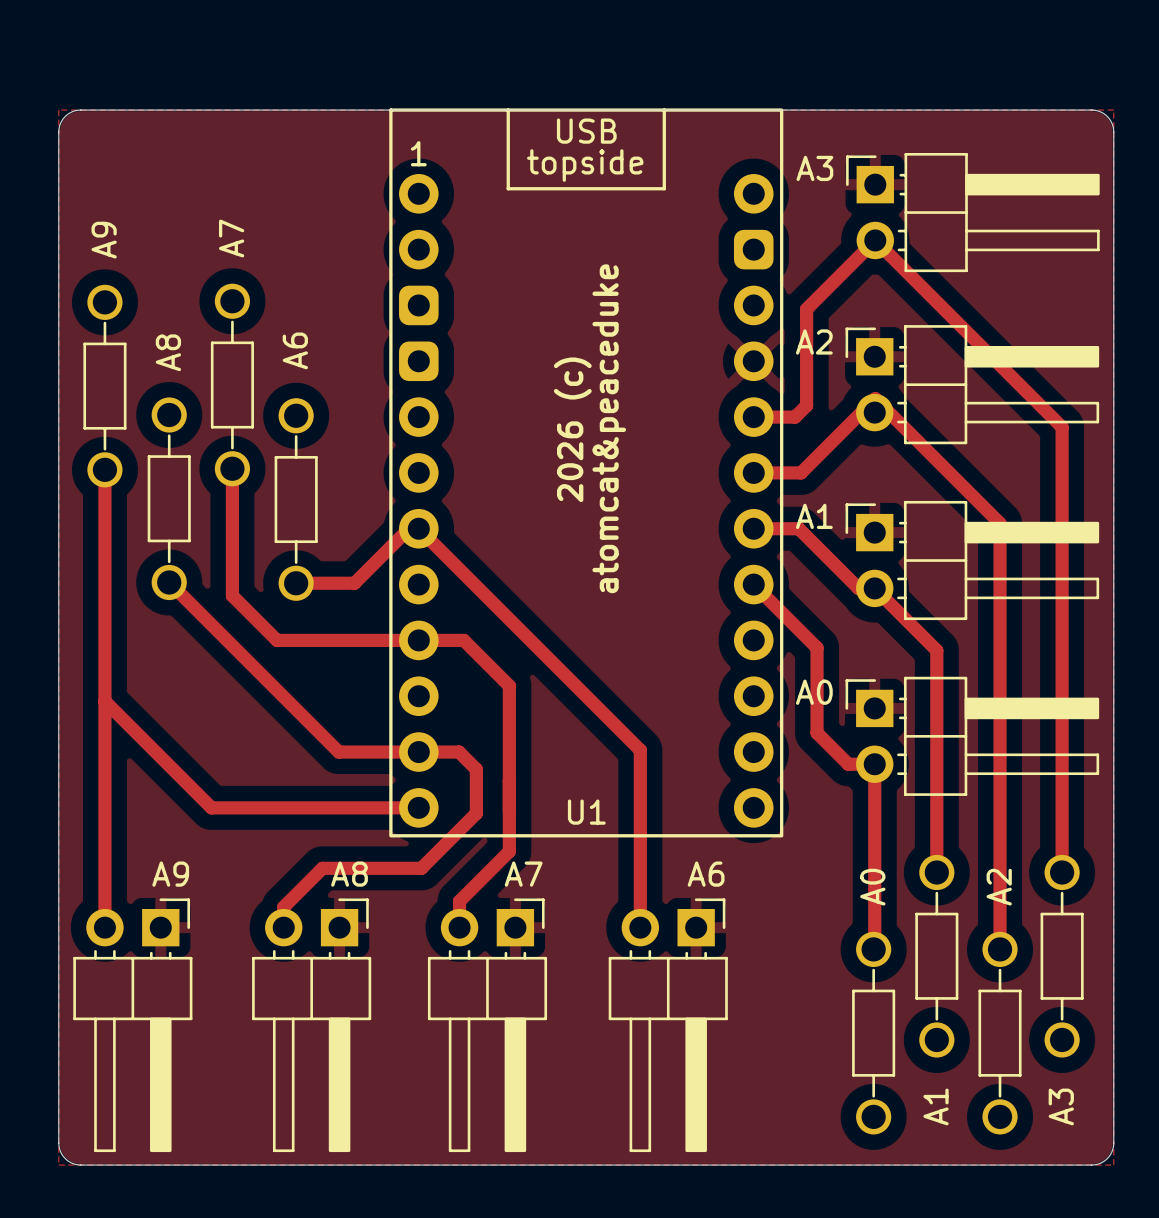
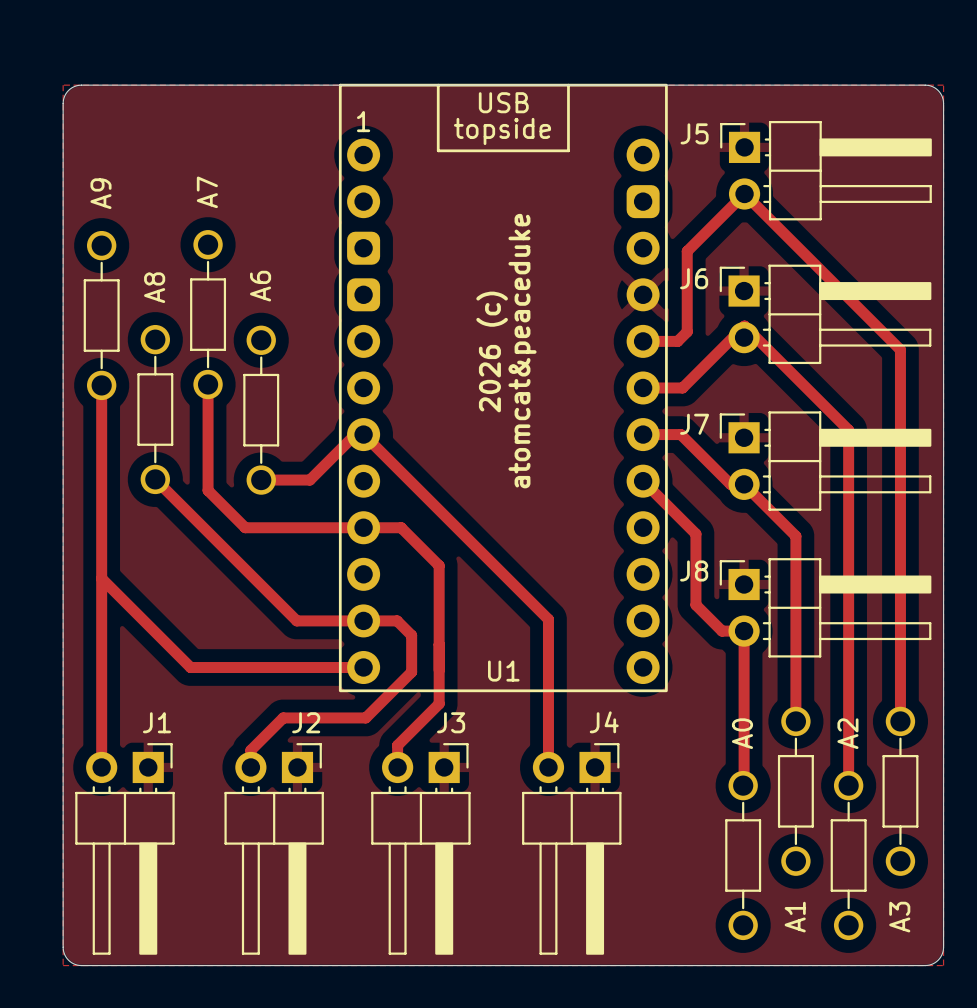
A3 name: A3 (814, 168) -> J5 (694, 133)
A2 name: A2 (814, 341) -> J6 (694, 278)
A1 name: A1 (814, 516) -> J7 (694, 424)
A0 name: A0 (814, 692) -> J8 (694, 570)
A9 name: A9 (170, 874) -> J1 (156, 722)
A8 name: A8 (349, 874) -> J2 (306, 722)
A7 name: A7 (523, 874) -> J3 (451, 722)
A6 name: A6 (706, 874) -> J4 (604, 722)

